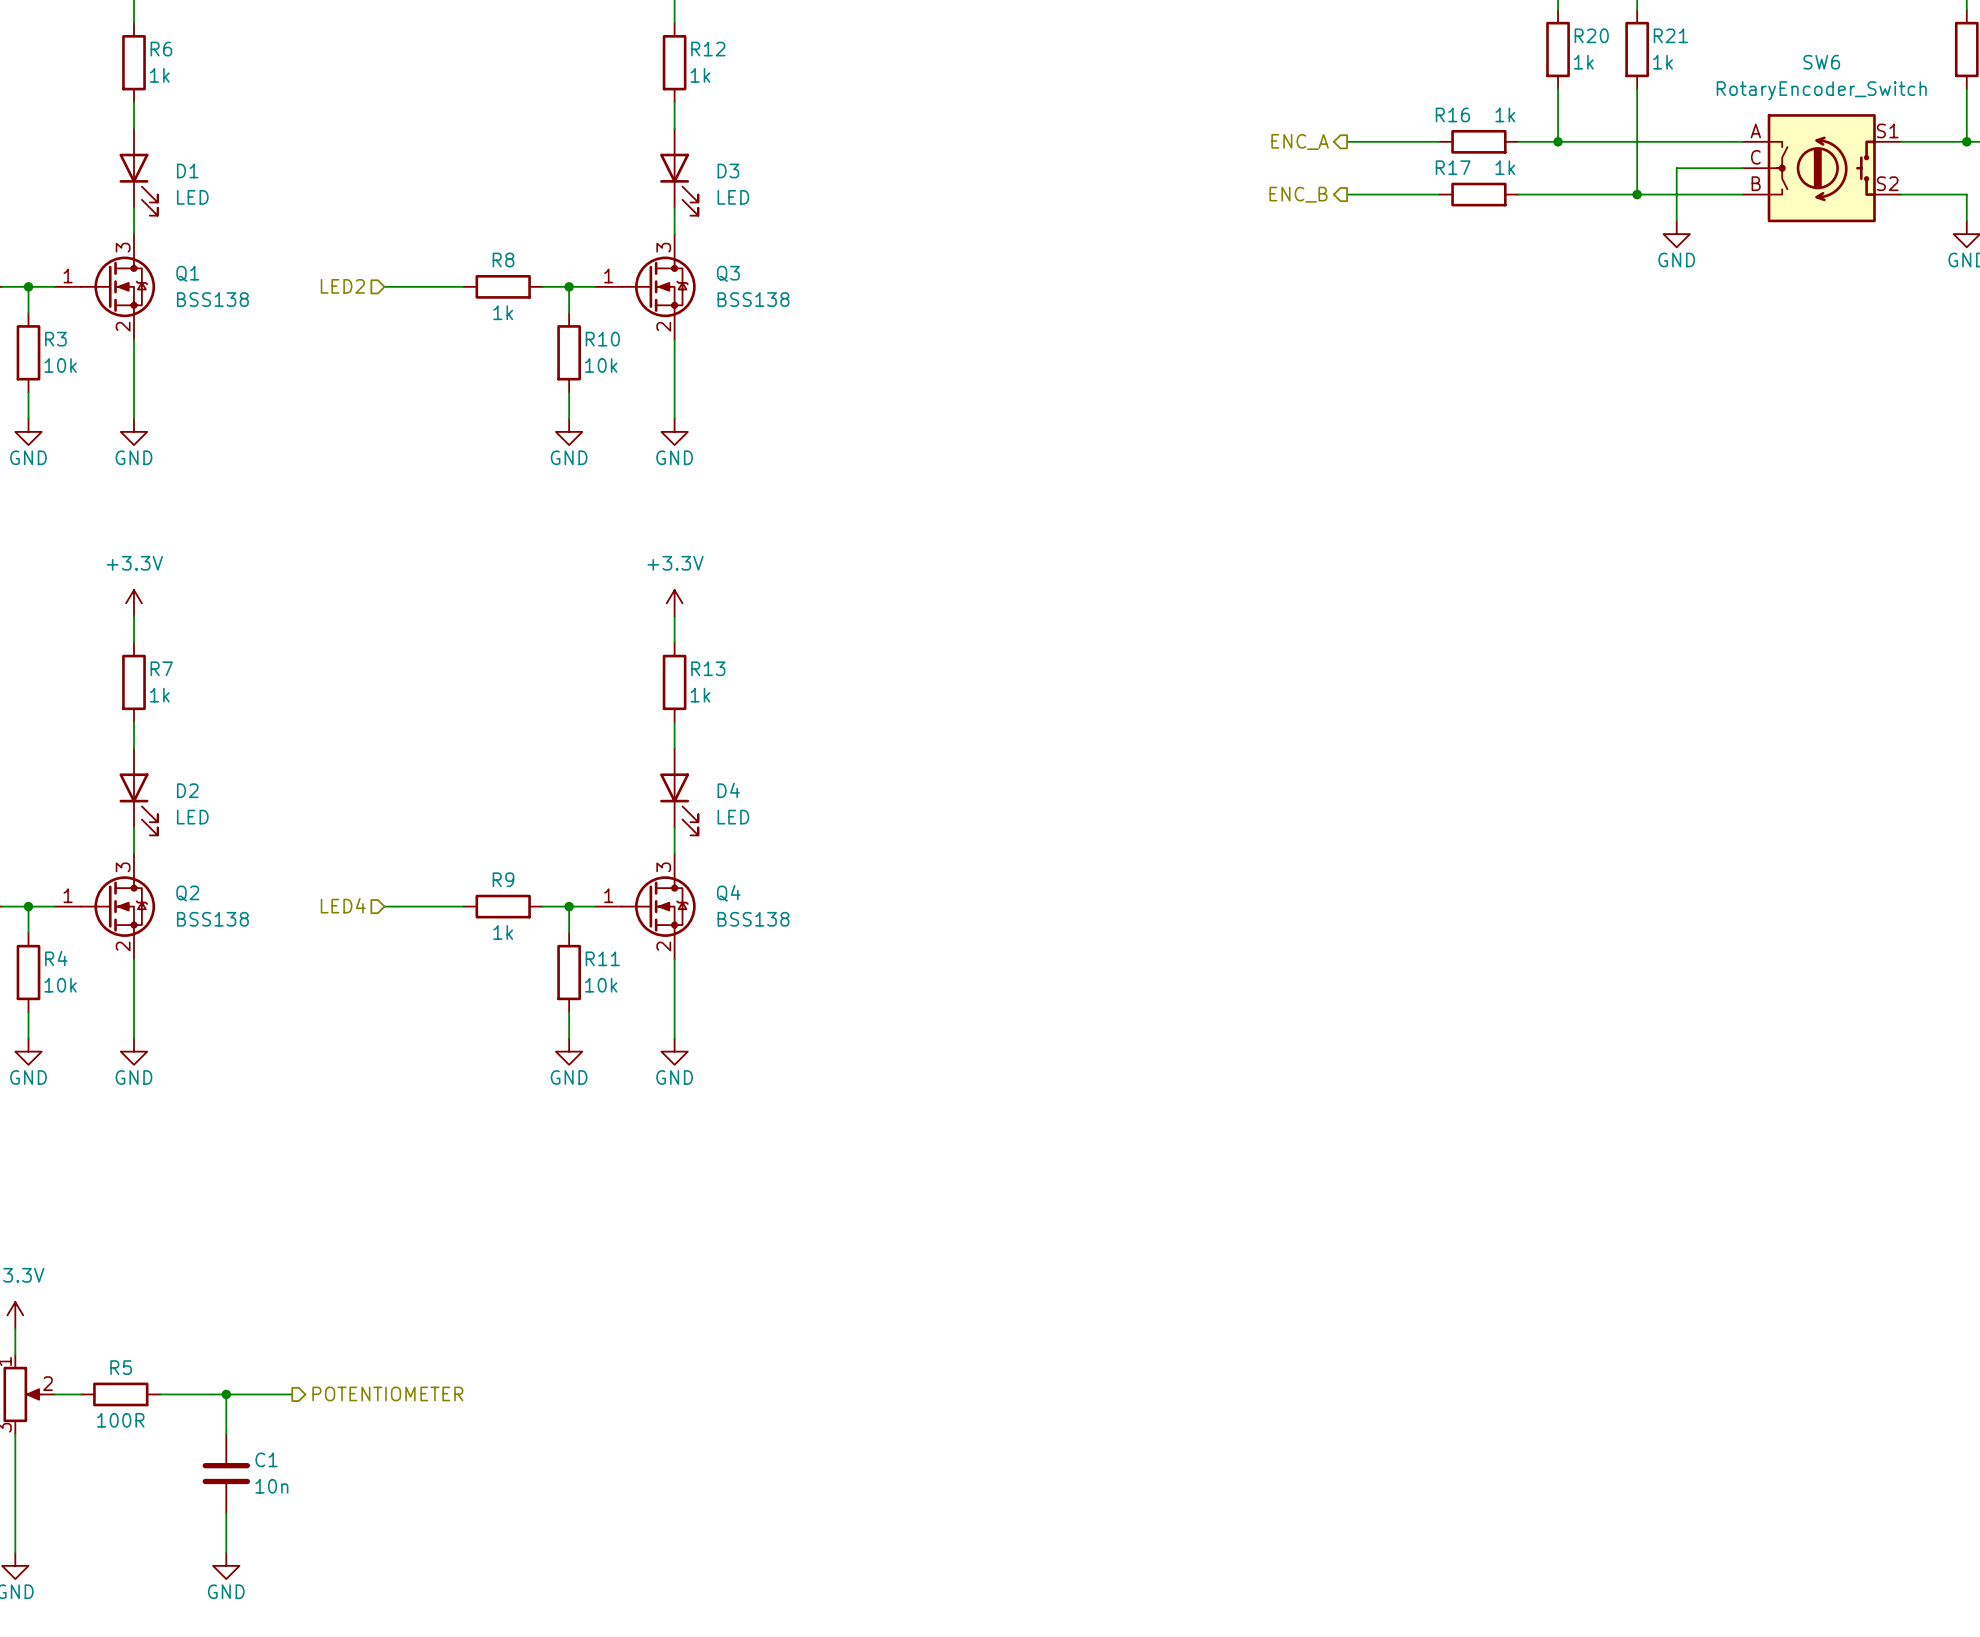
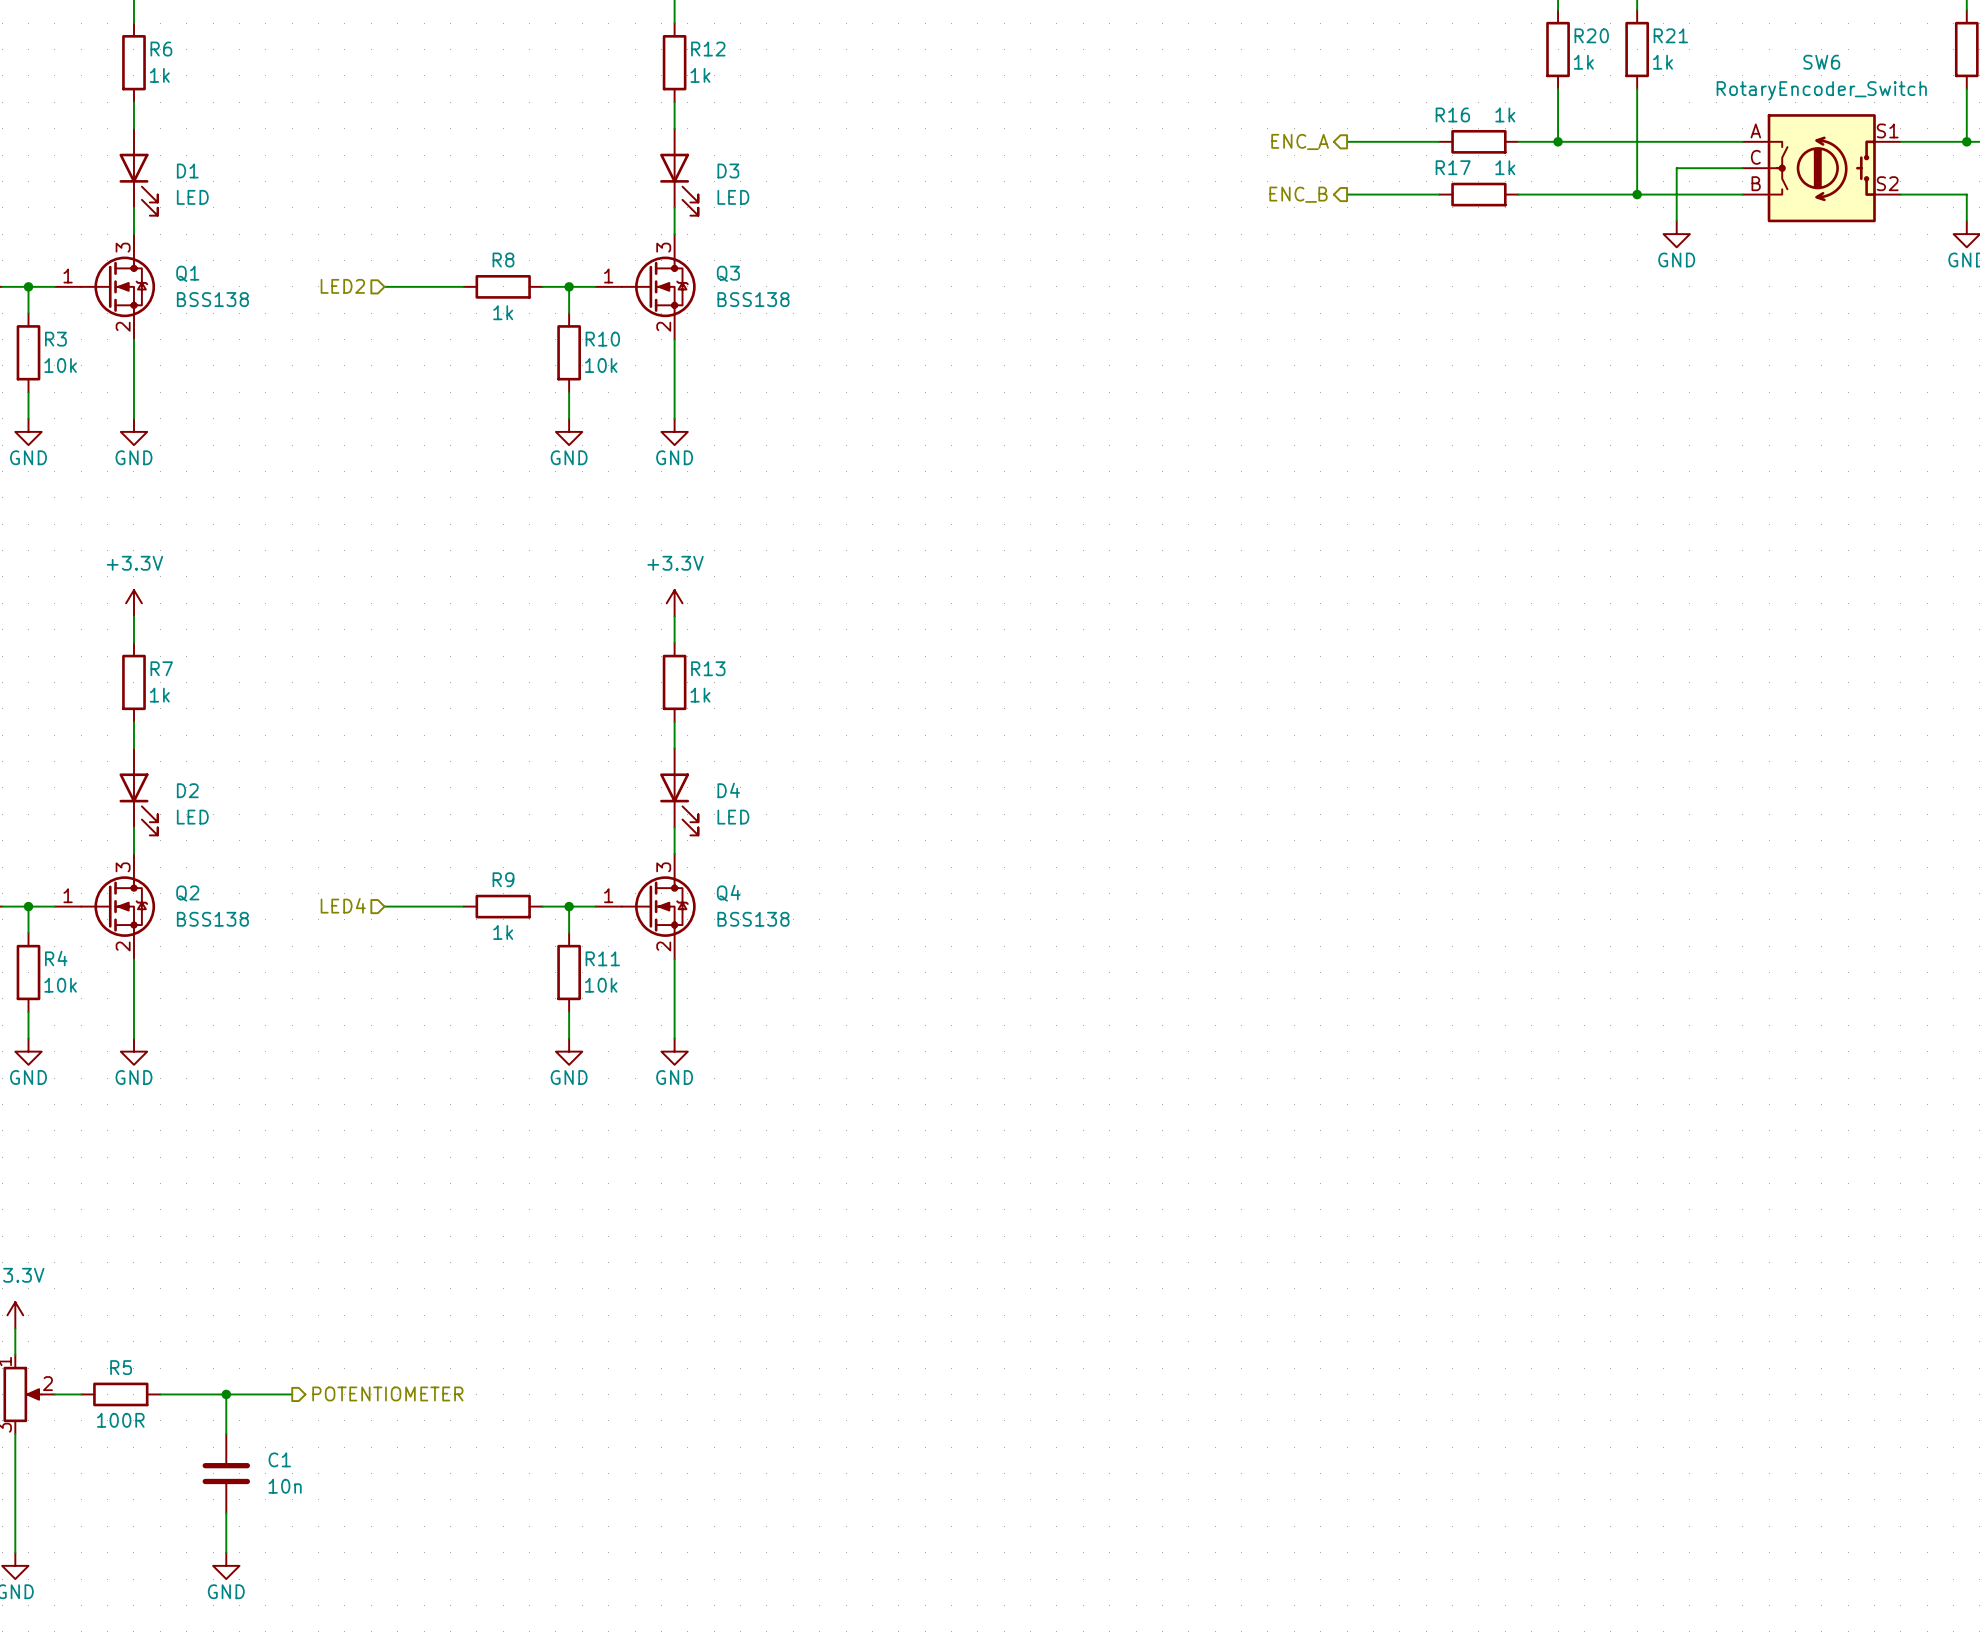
C1 name position: C1 (266, 1459) -> C1 (279, 1459)
C1 value position: 10n (271, 1486) -> 10n (285, 1486)

